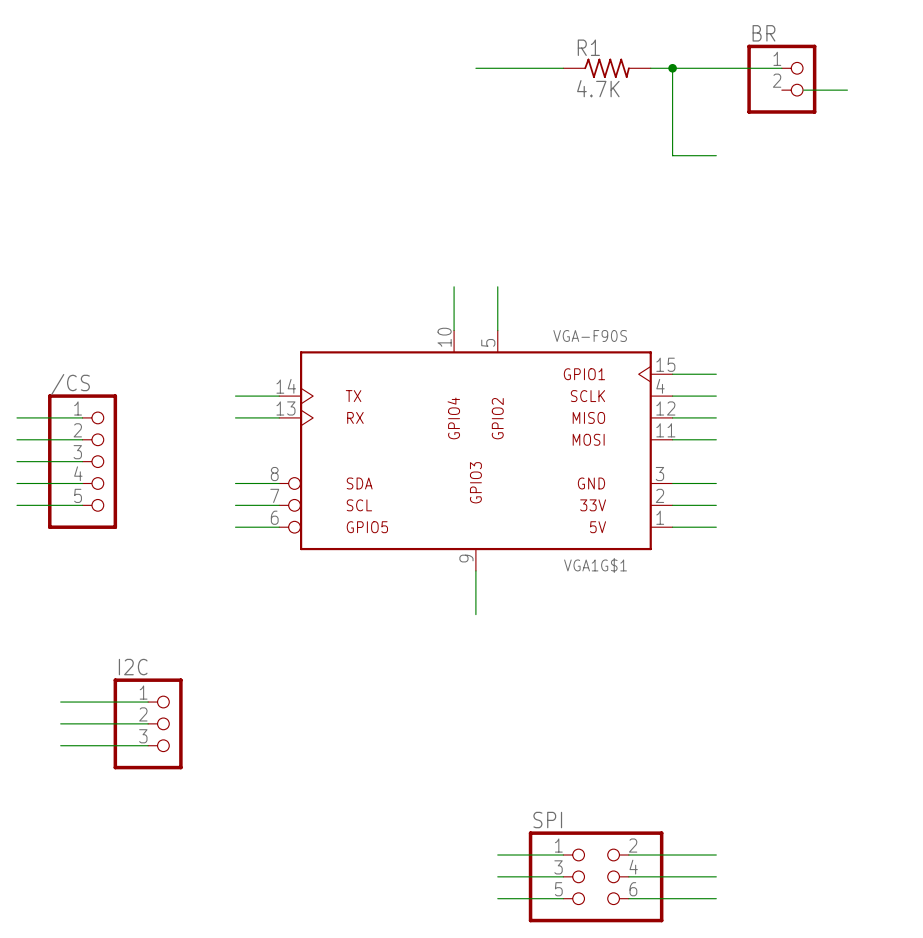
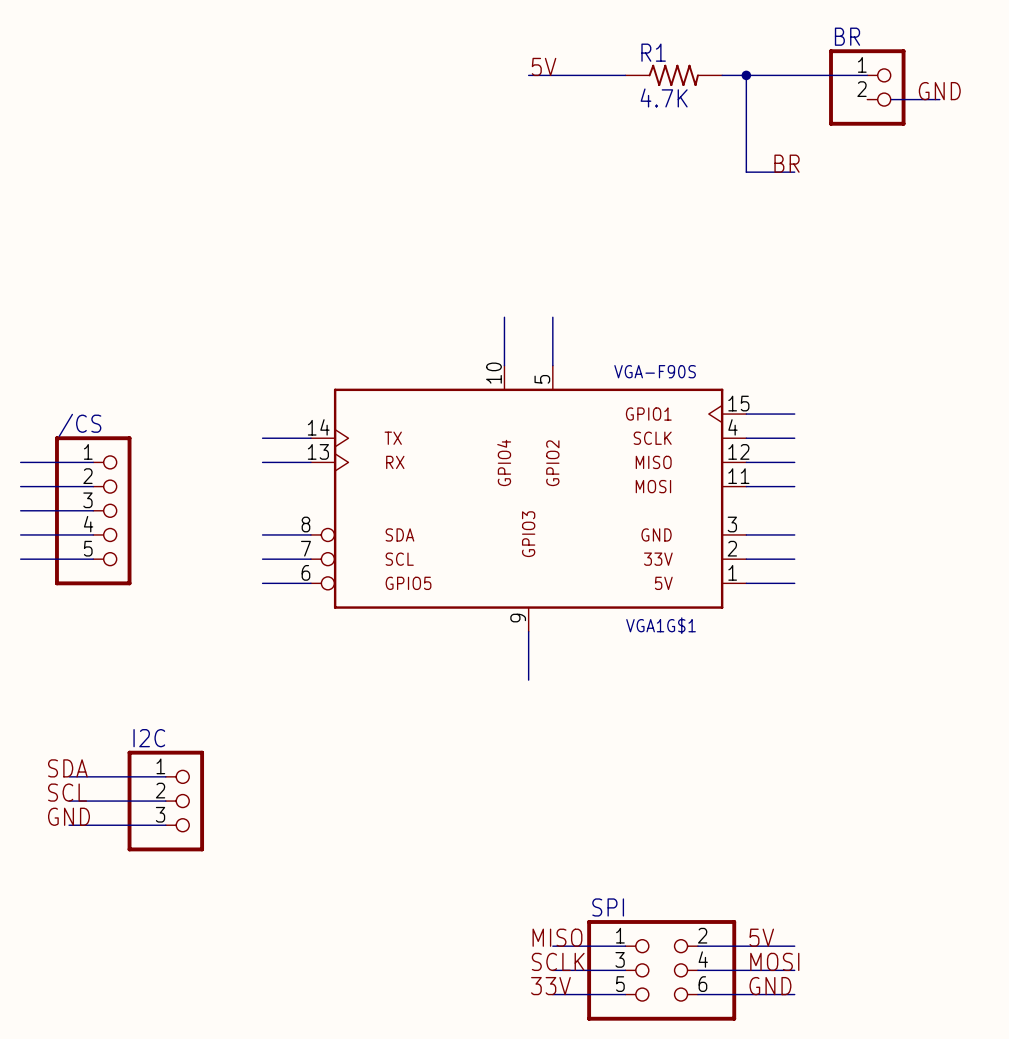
label: none -> 5V (544, 66)
label: none -> GND (939, 91)
label: none -> BR (787, 163)
label: none -> SDA (67, 768)
label: none -> SCL (67, 792)
label: none -> GND (68, 816)
label: none -> MISO (557, 937)
label: none -> 5V (761, 937)
label: none -> SCLK (558, 961)
label: none -> MOSI (774, 961)
label: none -> 33V (550, 986)
label: none -> GND (770, 986)

